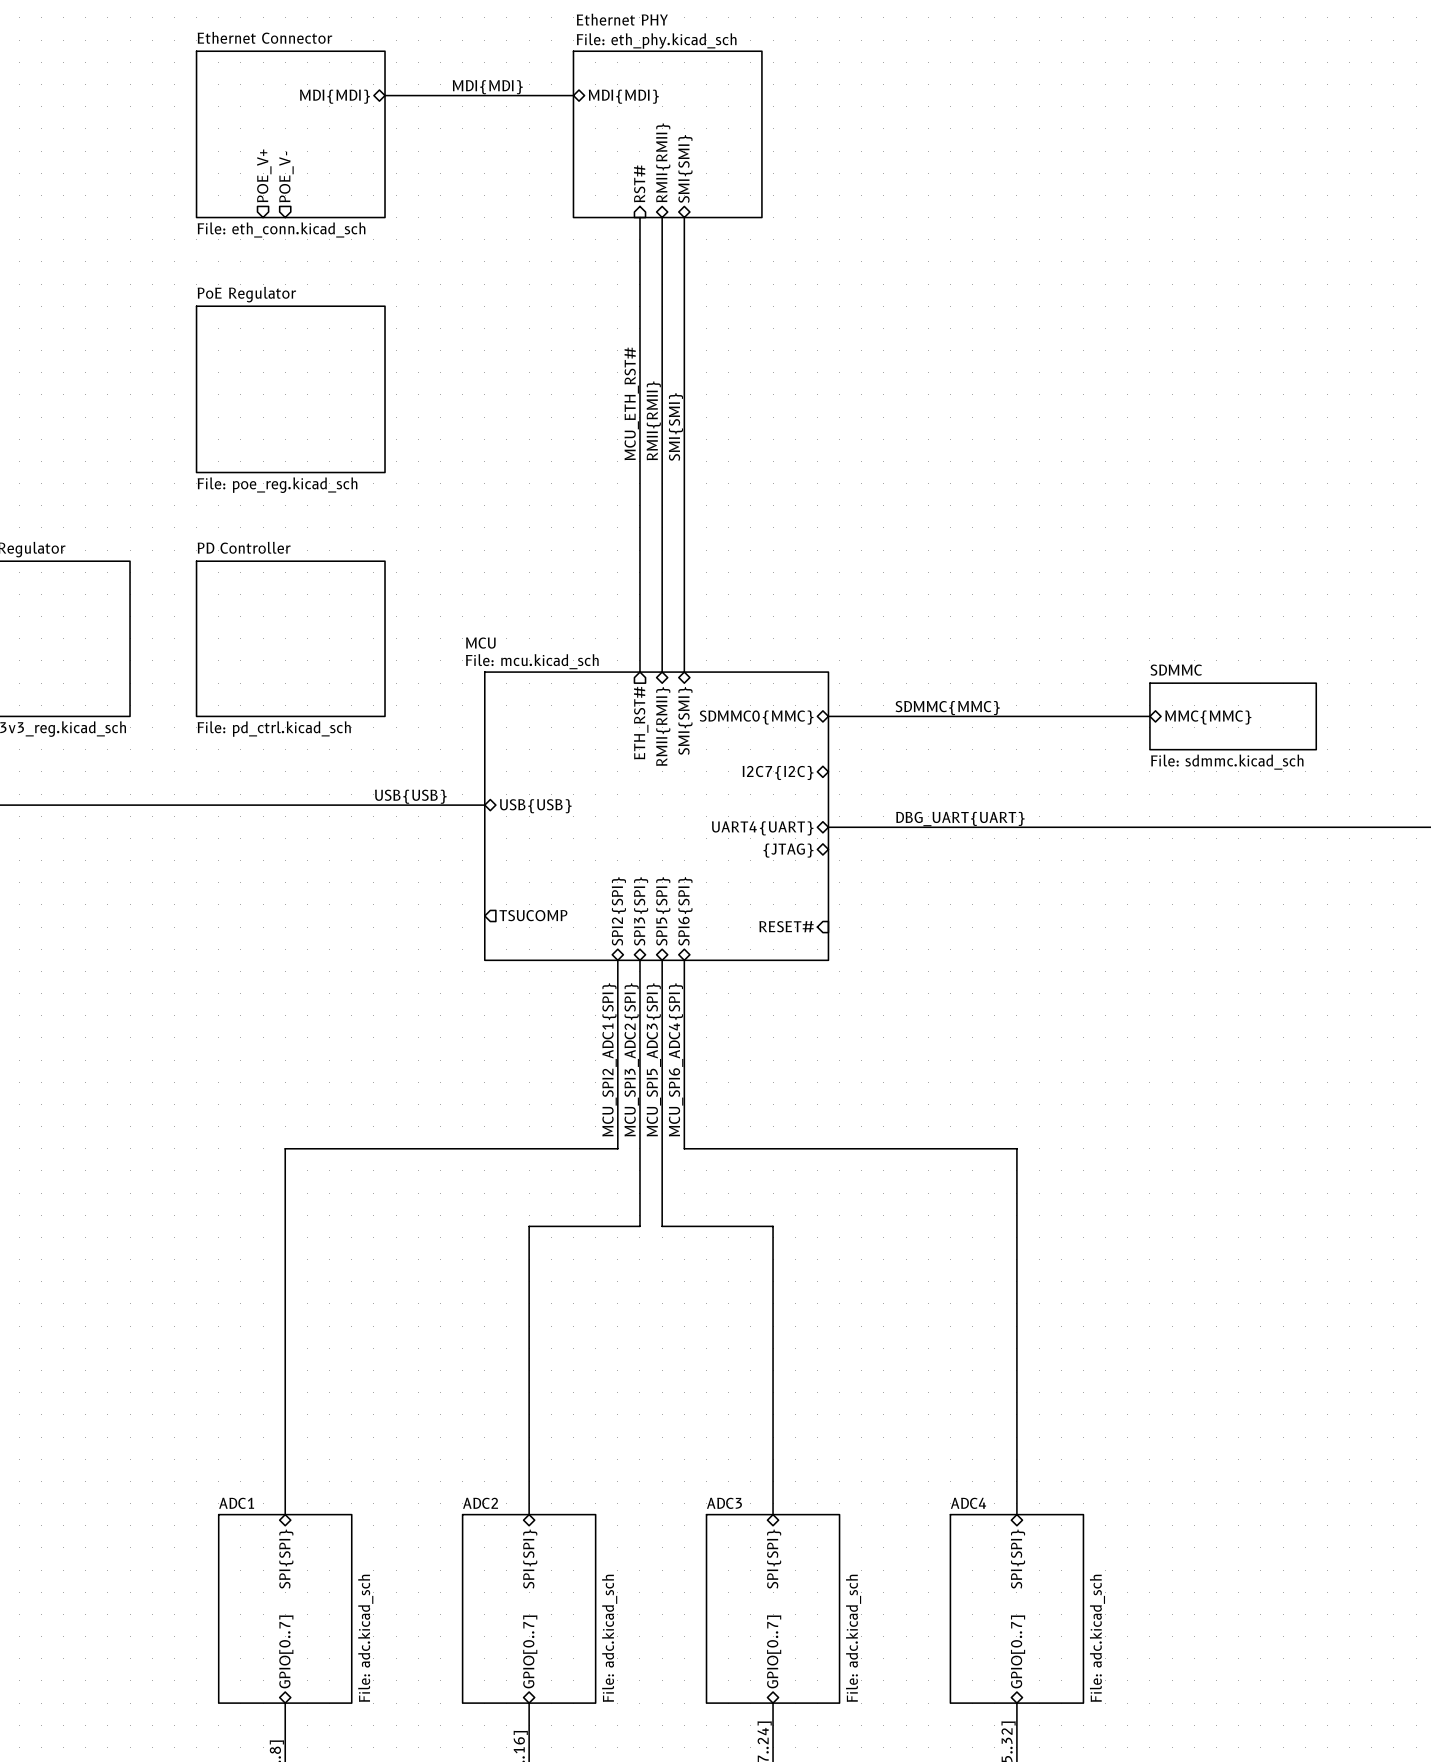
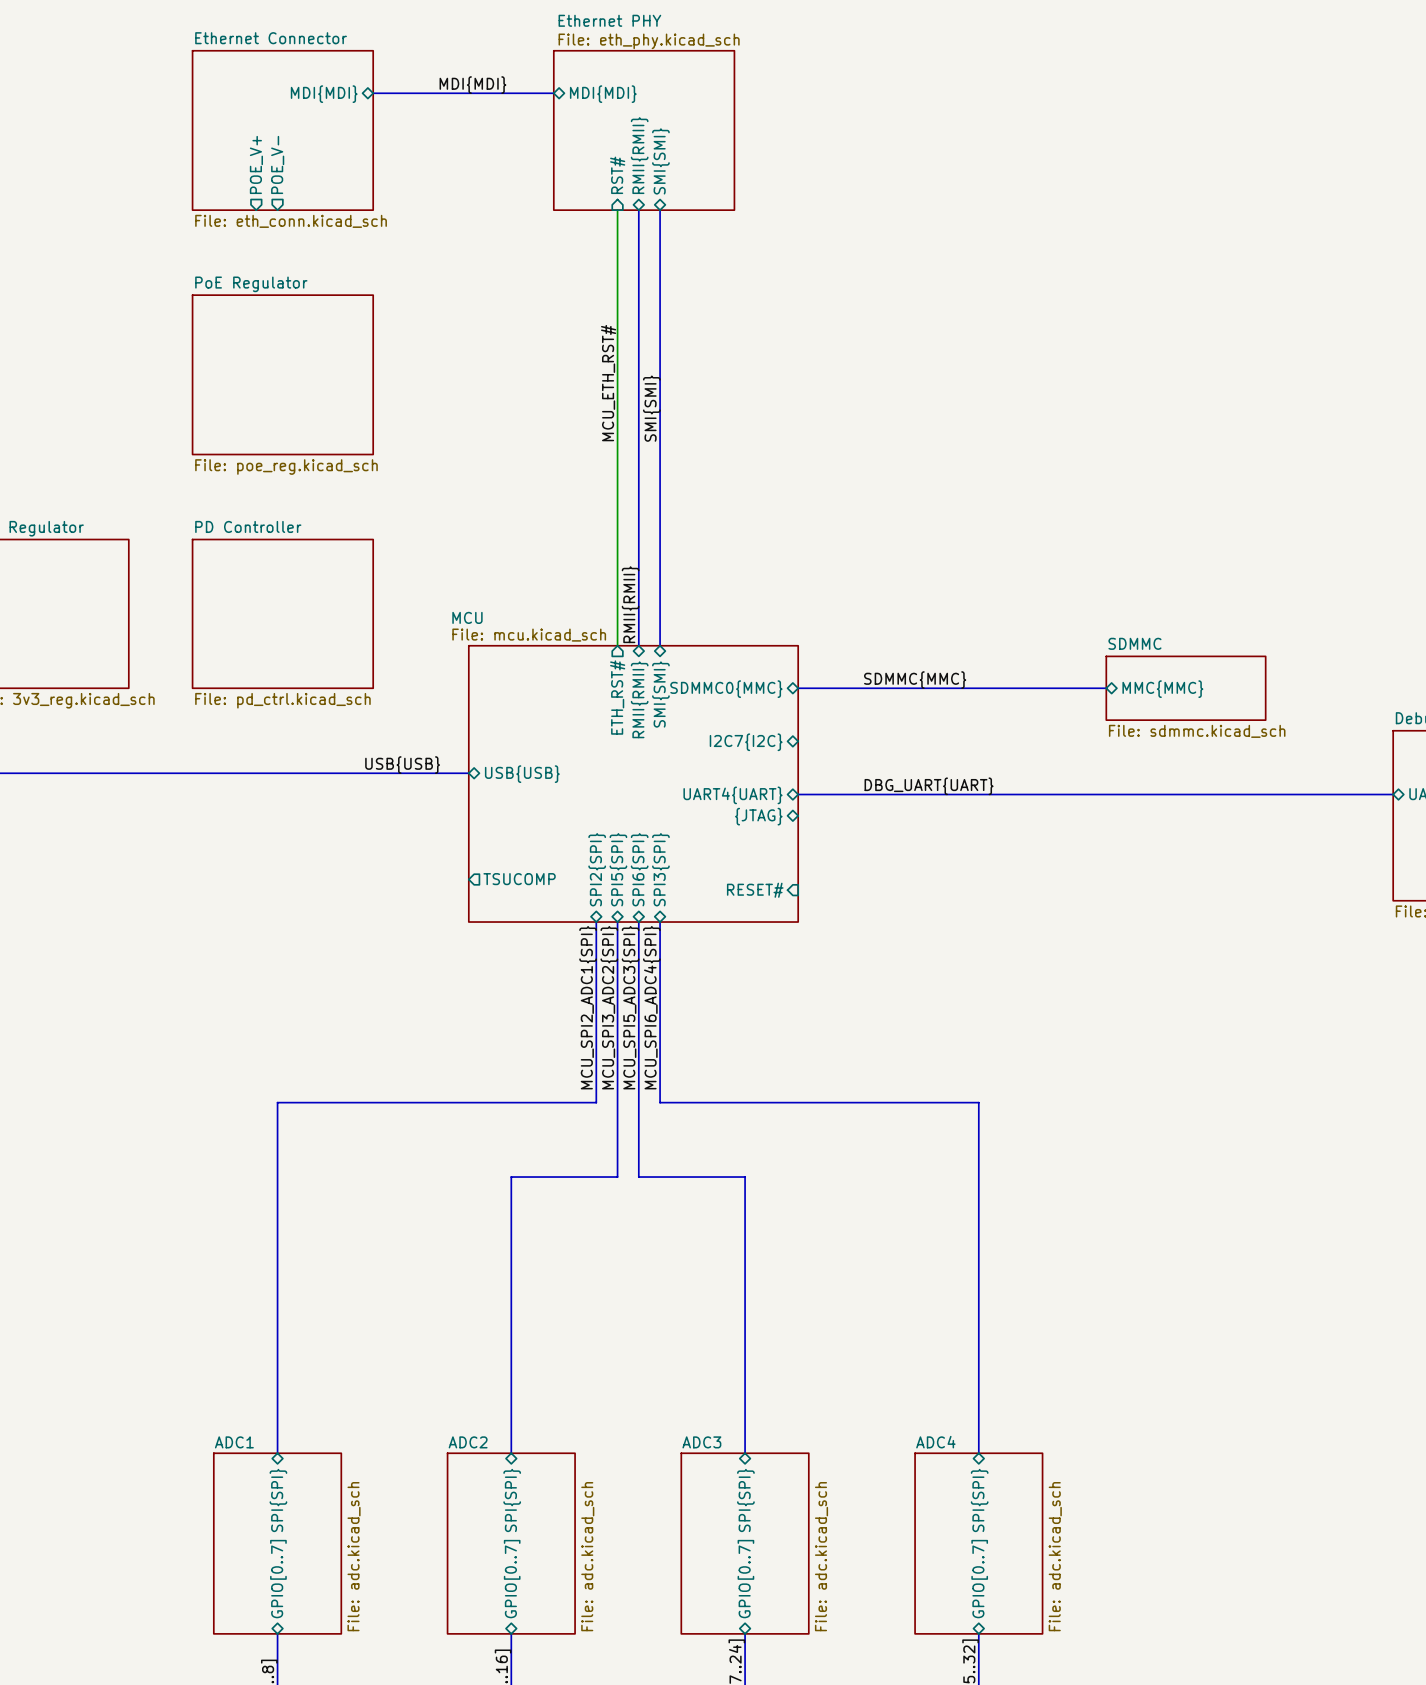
label position: RMII{RMII} (653, 420) -> RMII{RMII} (630, 604)
sheet pin: SPI3{SPI} (641, 911) -> SPI5{SPI} (618, 869)
sheet pin: SPI5{SPI} (663, 911) -> SPI6{SPI} (639, 869)
sheet pin: SPI6{SPI} (685, 911) -> SPI3{SPI} (660, 869)

